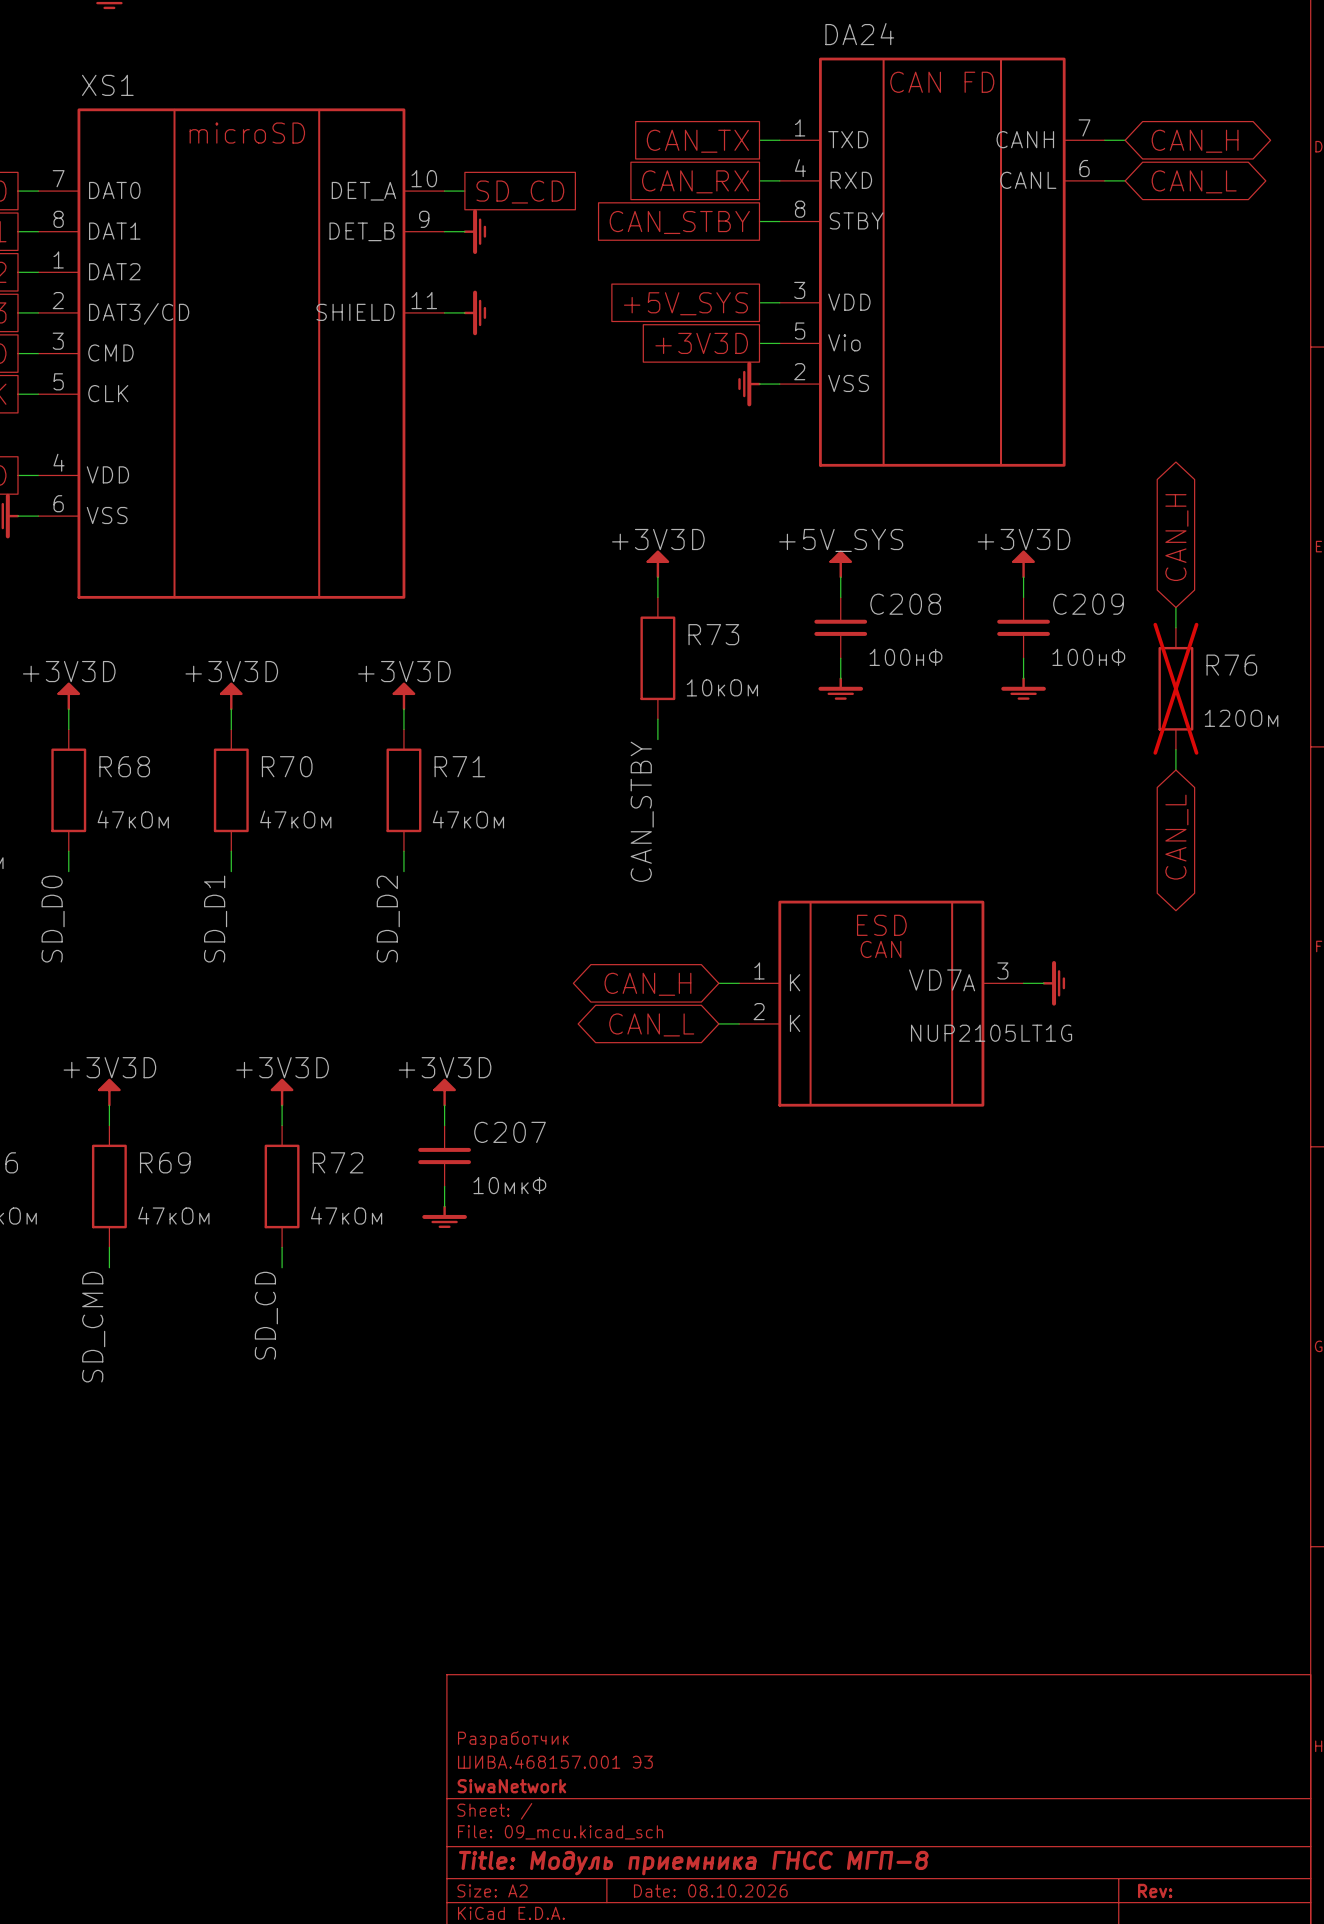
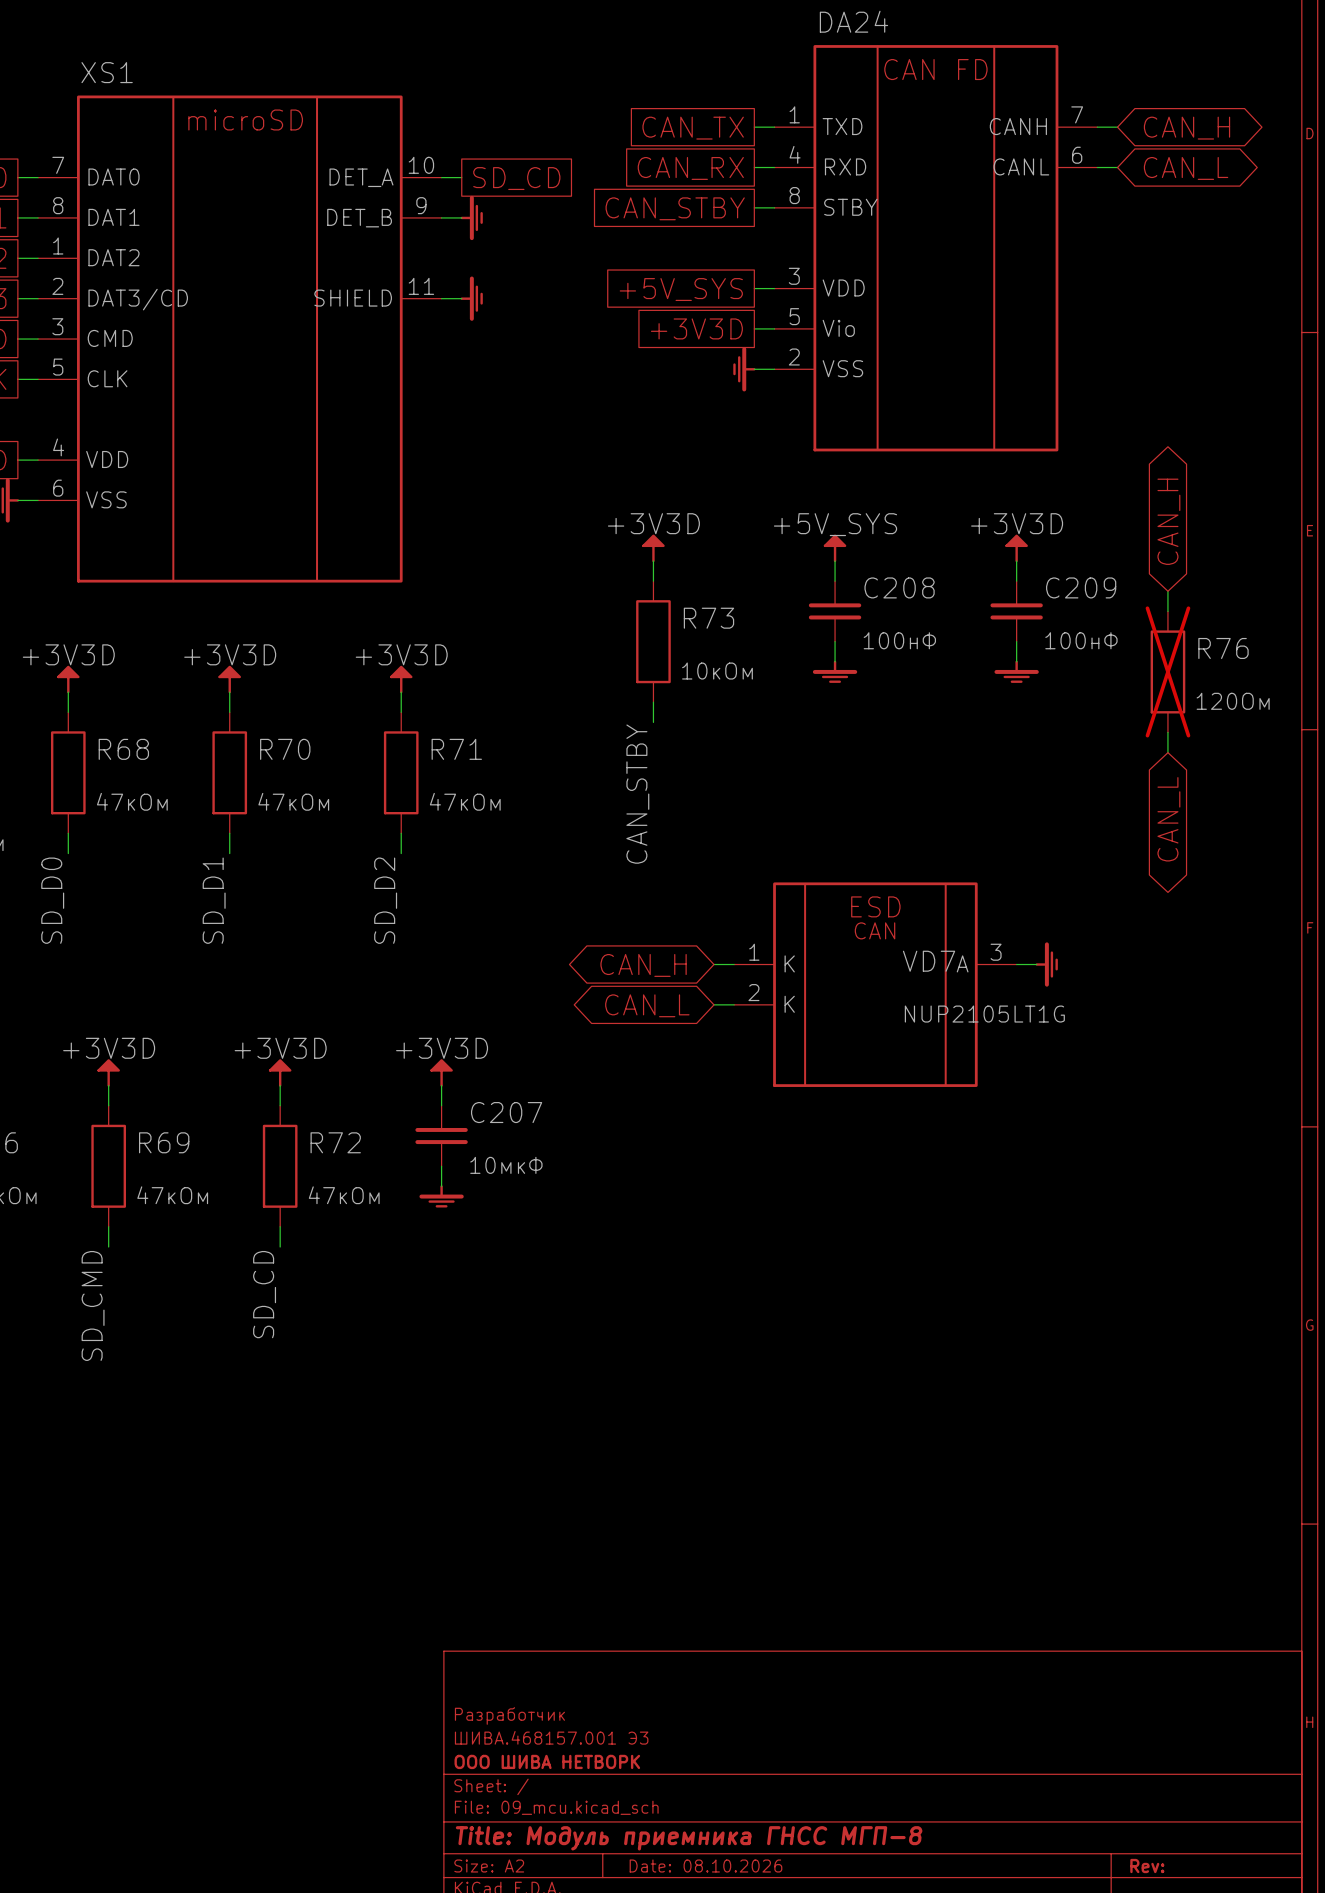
title block: SiwaNetwork (511, 1786) -> ООО ШИВА НЕТВОРК (547, 1761)

